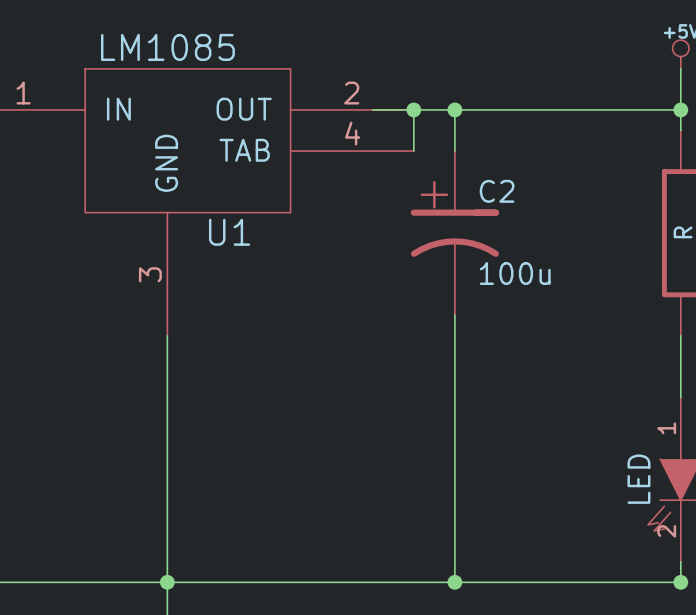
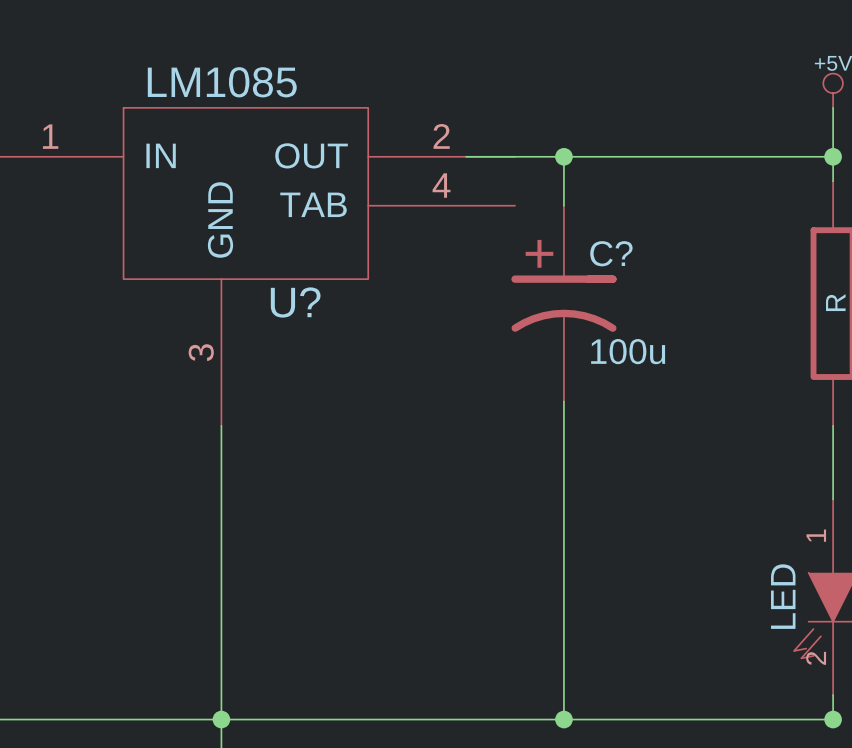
wire: (413, 109) (413, 151) -> none
junction: (413, 109) -> none
C2 name: C2 (497, 191) -> C? (611, 253)
U1 name: U1 (229, 232) -> U? (295, 302)

